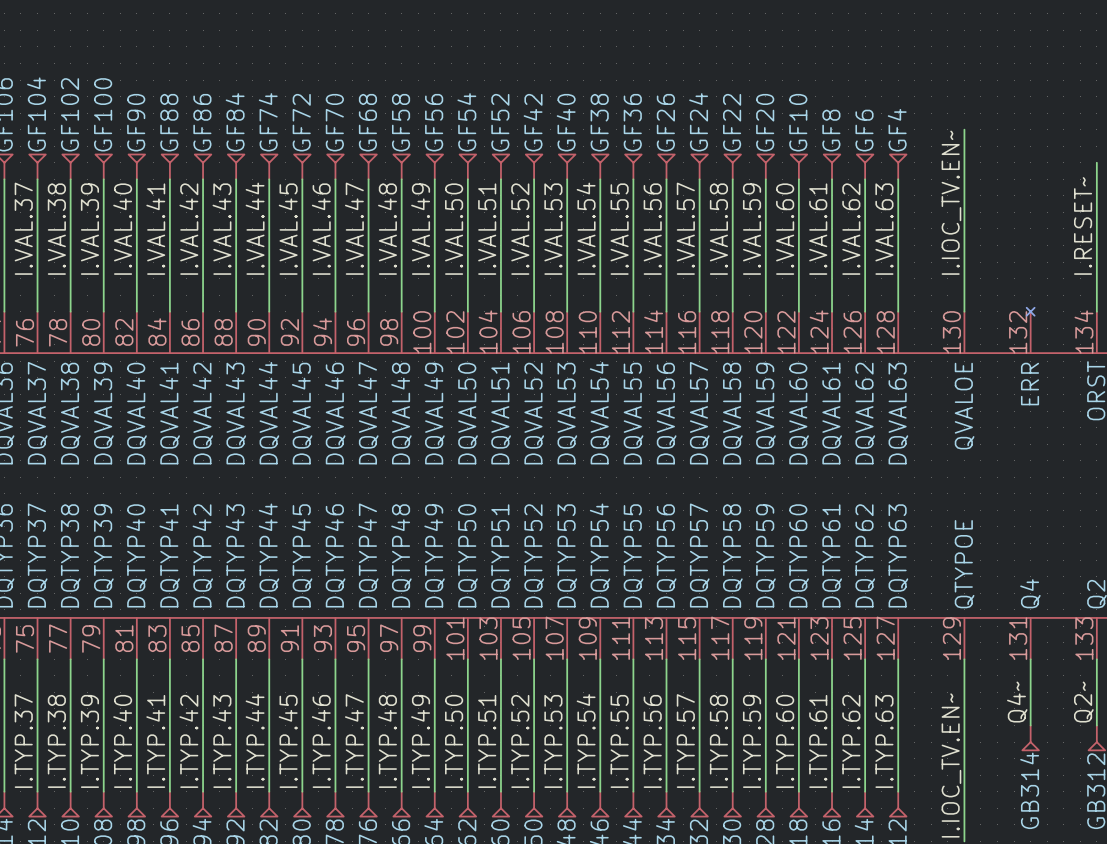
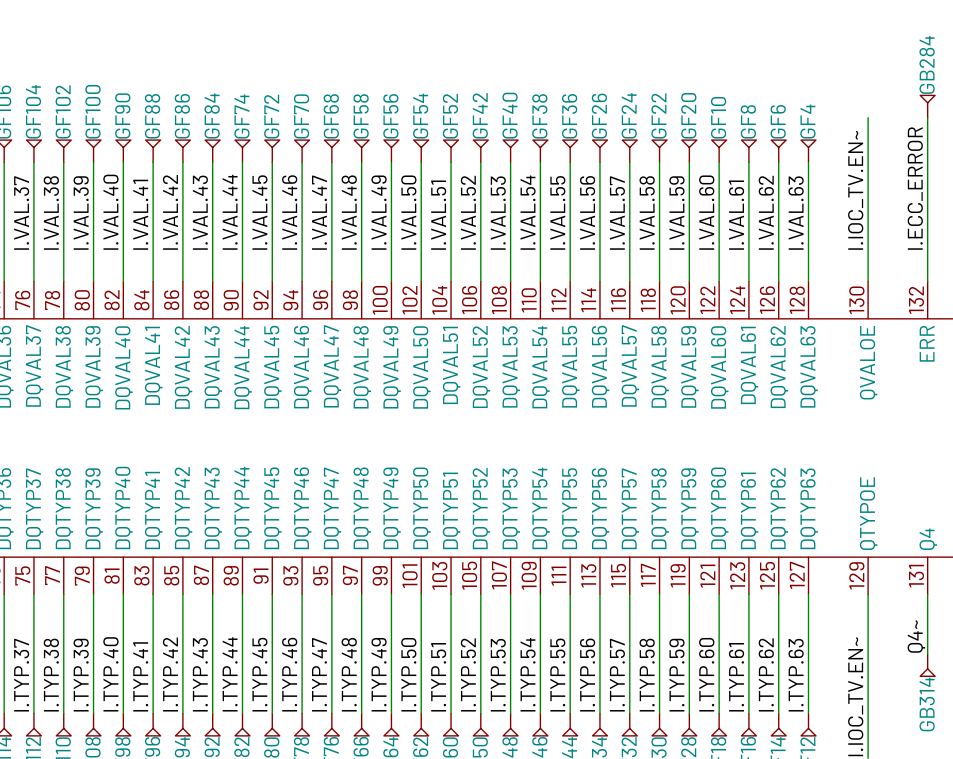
GB284: none -> (927, 106)
wire: none -> (927, 117) (927, 281)
label: none -> I.ECC_ERROR (915, 188)
no-connect mark: (1030, 311) -> none

